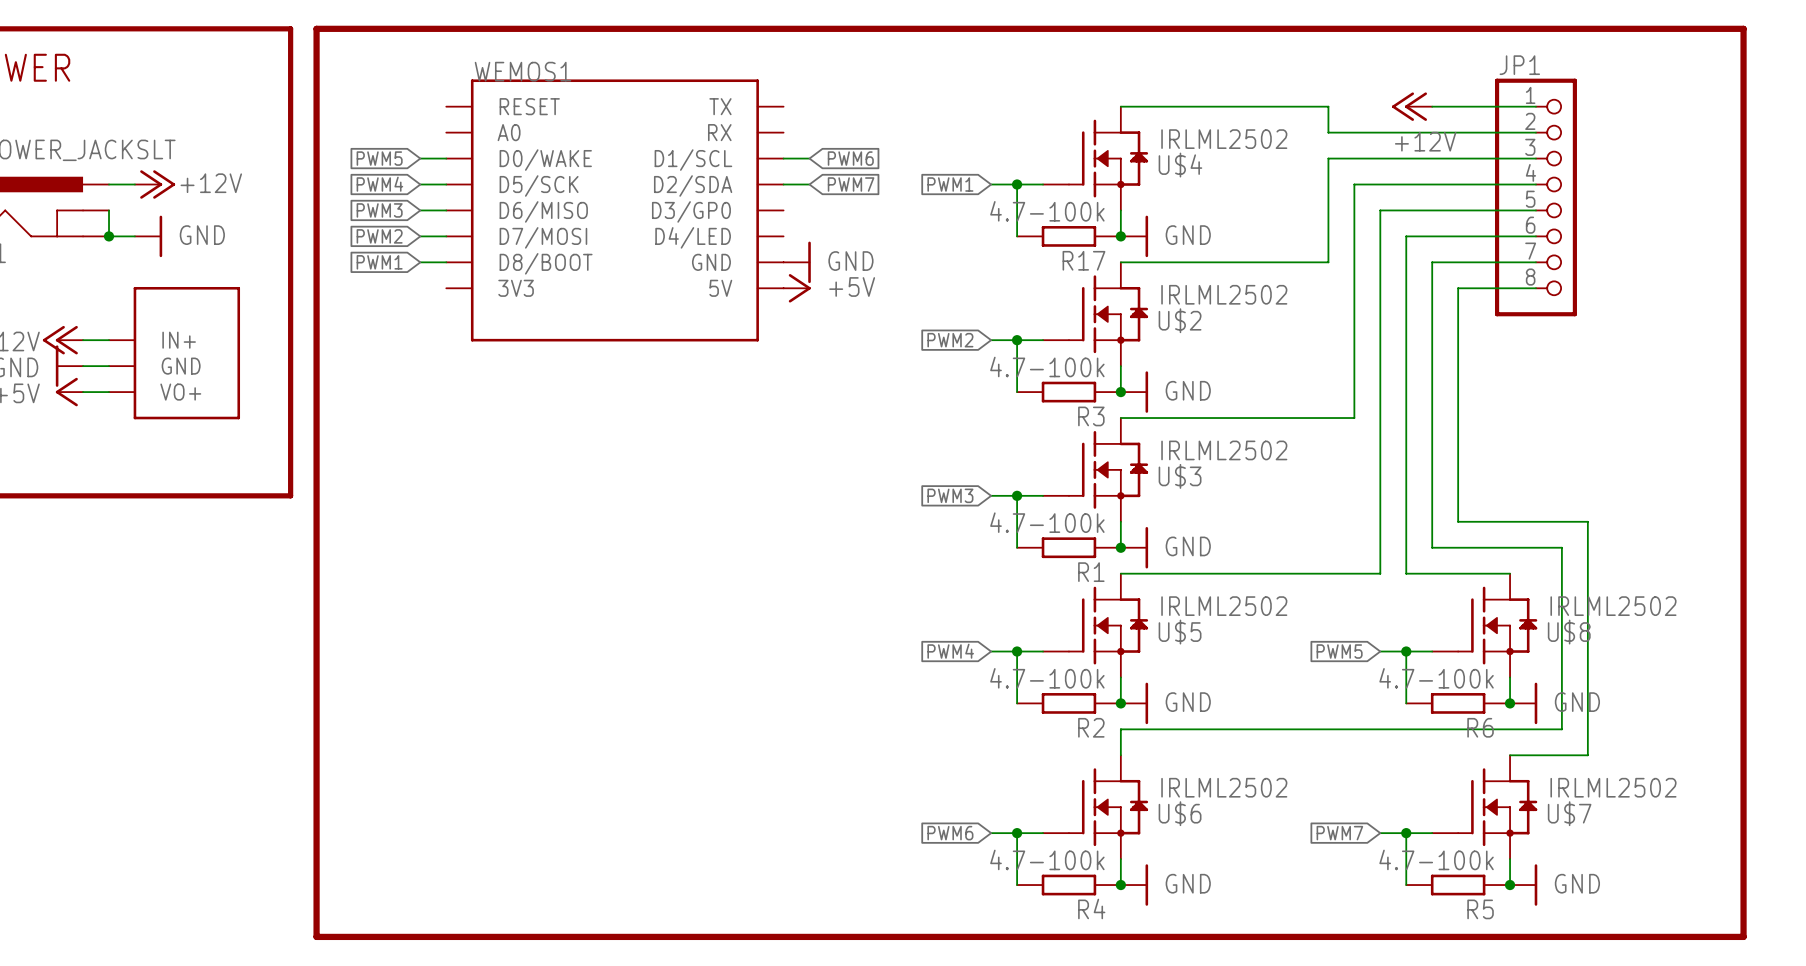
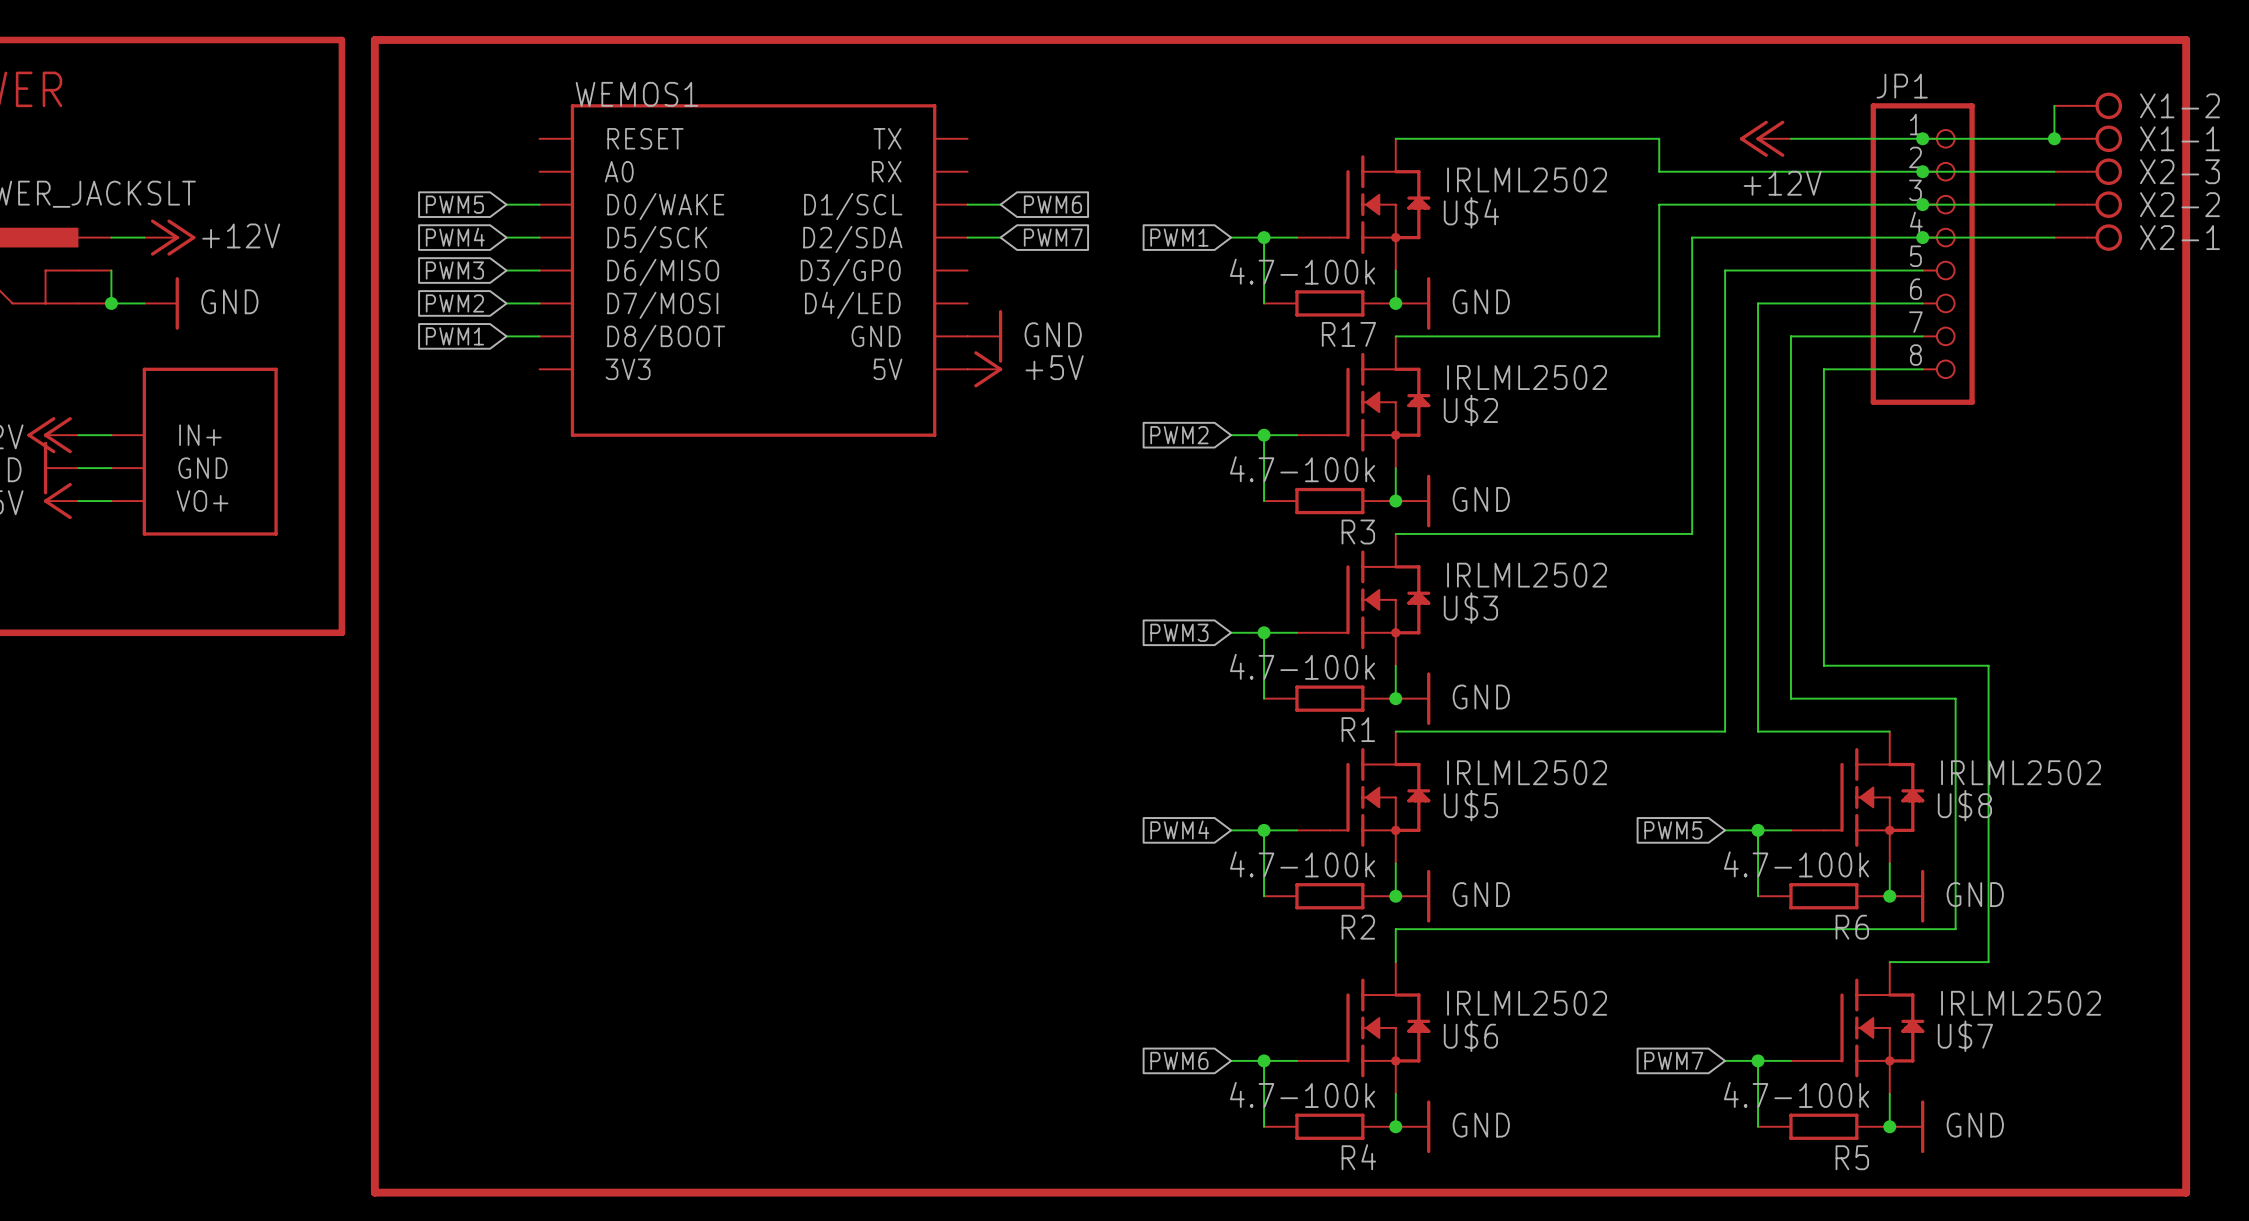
wire: none -> (2054, 105) (2054, 138) (1922, 138)
X1-2: none -> (2088, 105)
junction: none -> (1922, 138)
junction: none -> (2054, 138)
X1-1: none -> (2088, 138)
wire: none -> (1922, 171) (2054, 171)
junction: none -> (1922, 171)
X2-3: none -> (2088, 171)
wire: none -> (1922, 204) (2054, 204)
junction: none -> (1922, 204)
X2-2: none -> (2088, 204)
wire: none -> (1922, 237) (2054, 237)
junction: none -> (1922, 237)
X2-1: none -> (2088, 237)

